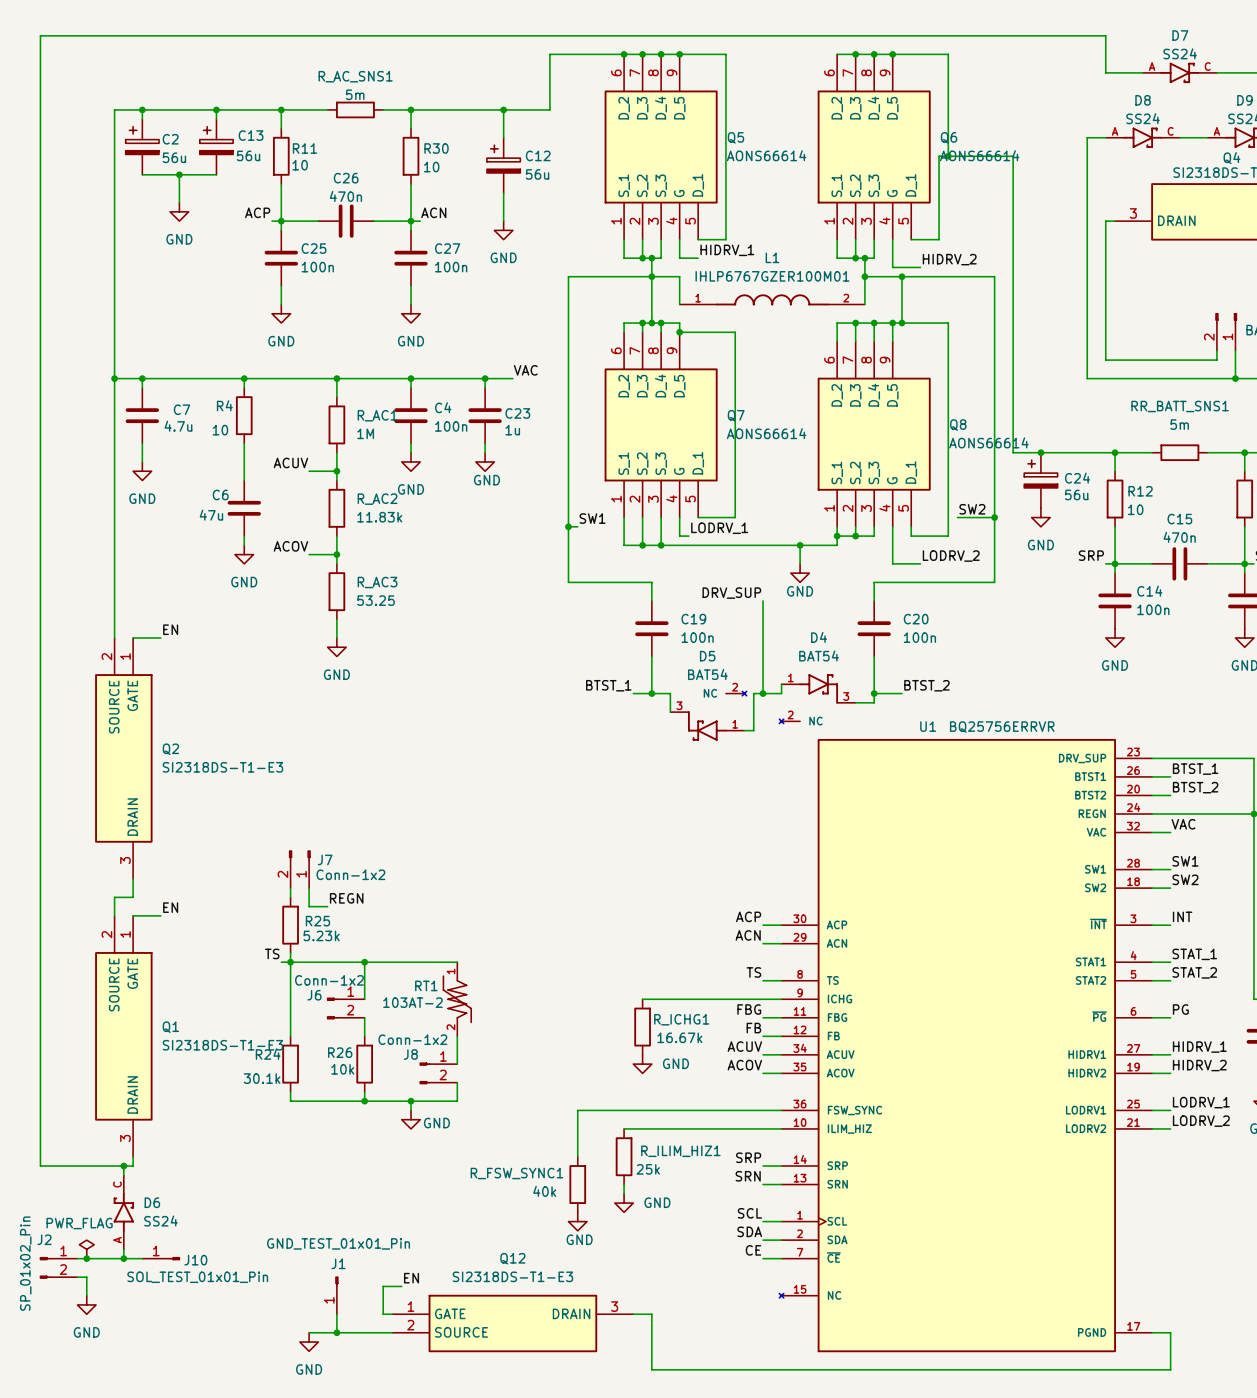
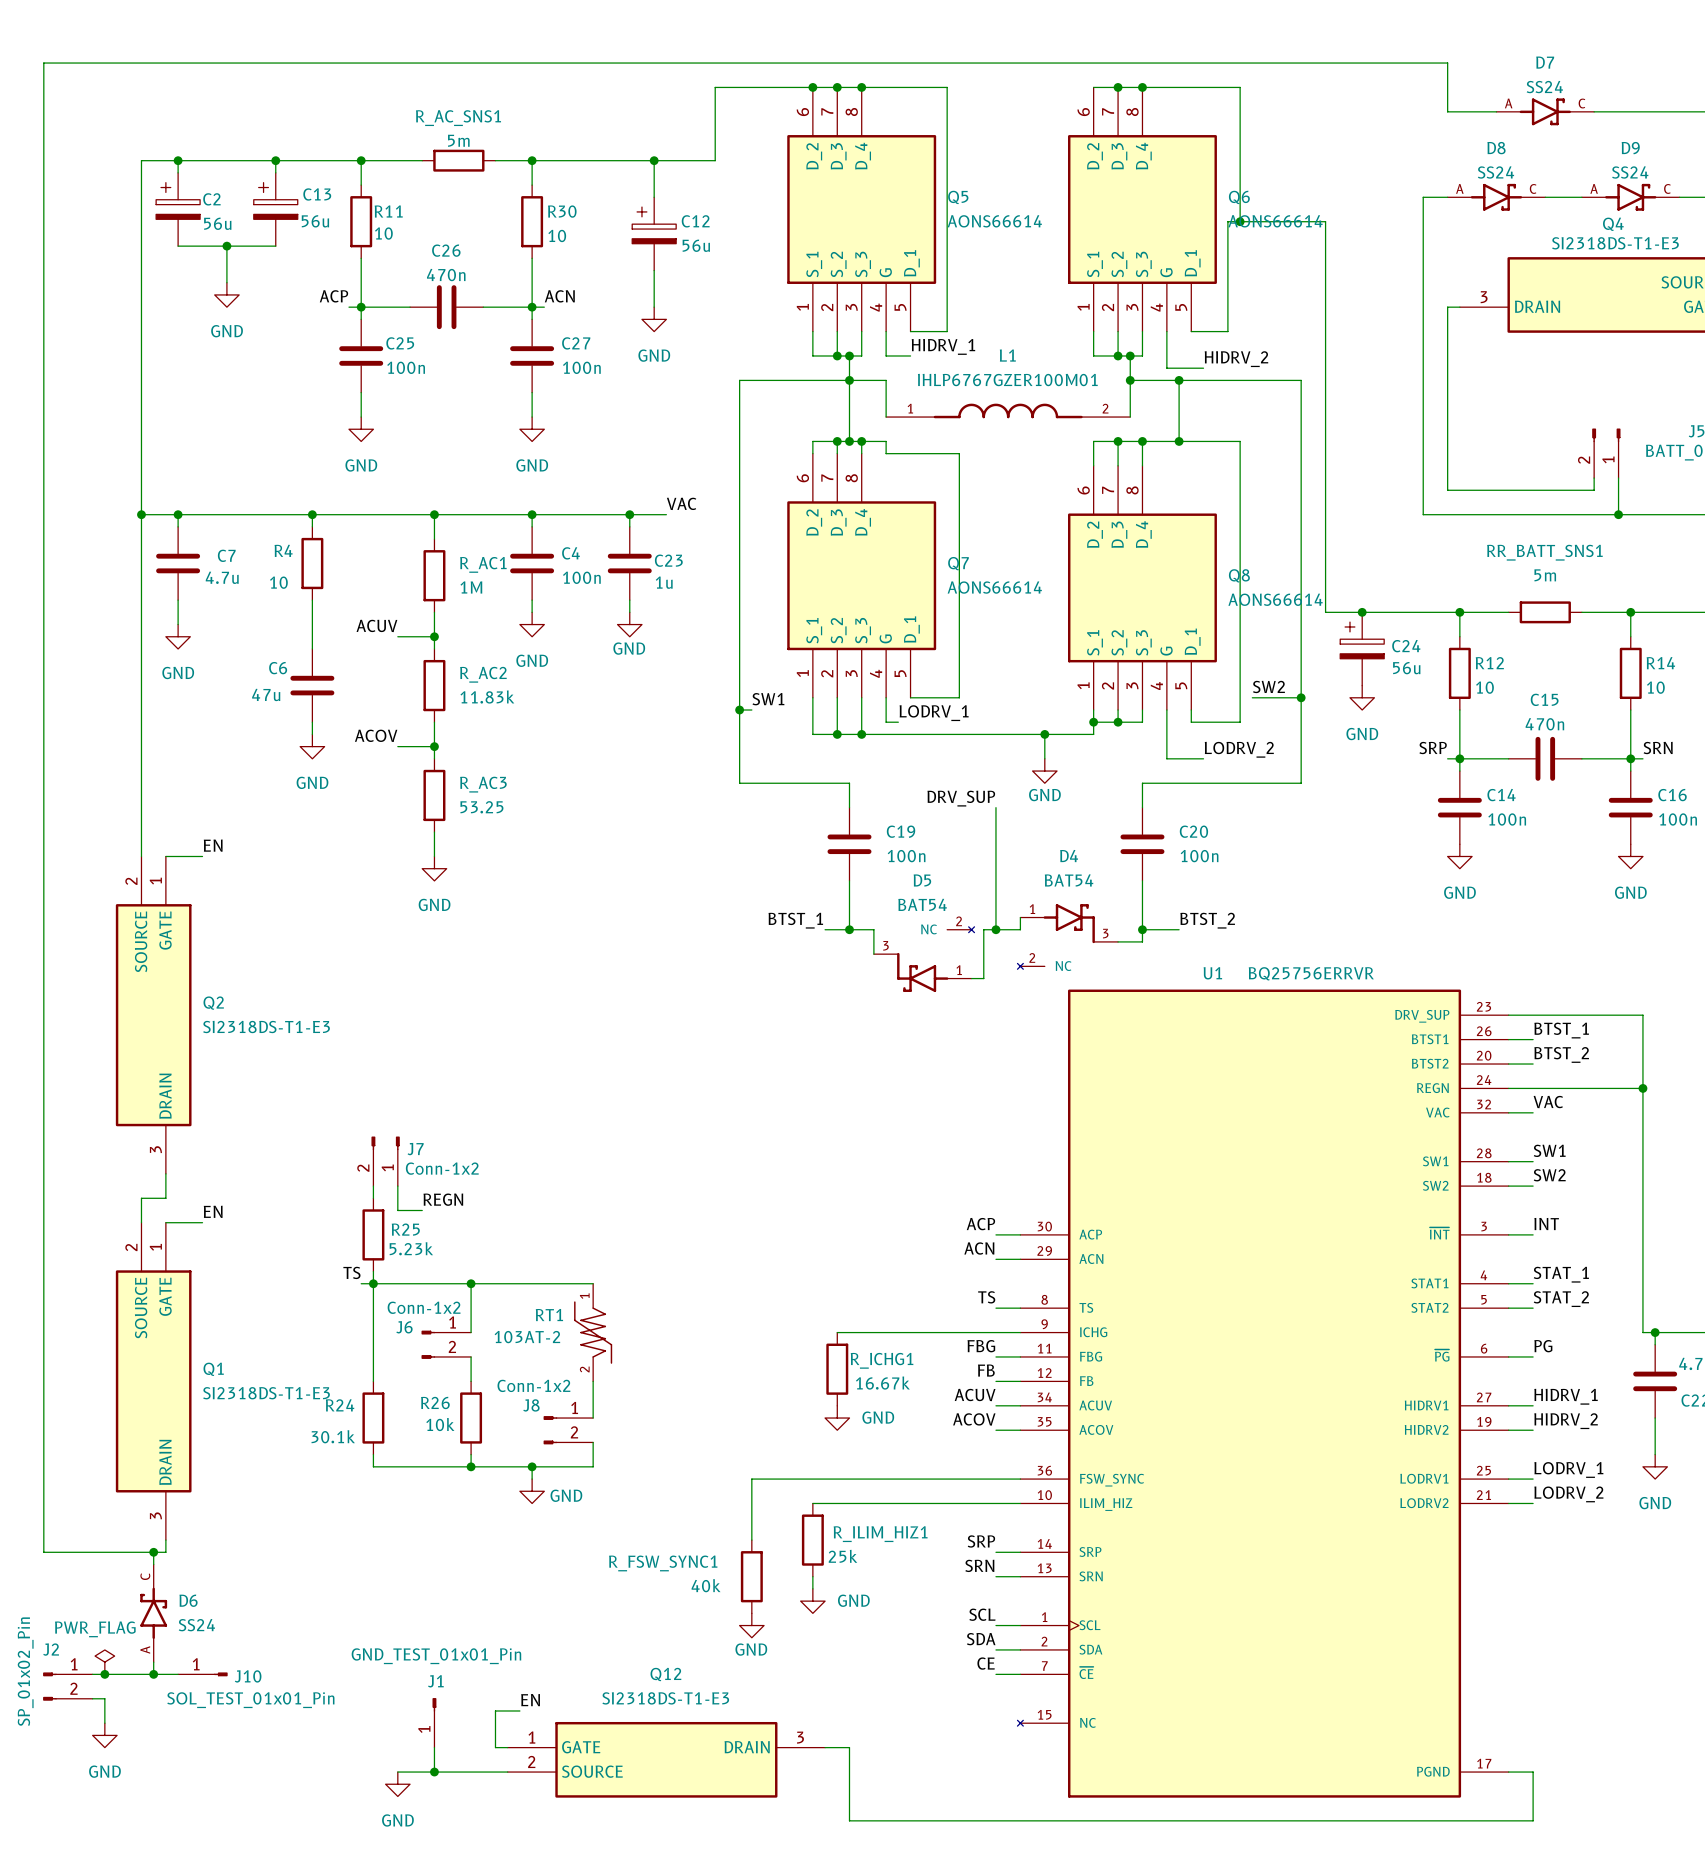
Q5 symbol: [604, 54, 718, 240] -> [787, 87, 937, 332]
junction: (679, 54) -> none
Q6 symbol: [817, 54, 931, 240] -> [1068, 87, 1217, 332]
junction: (892, 54) -> none
wire: (892, 323) (892, 341) -> none
junction: (892, 323) -> none
Q7 symbol: [604, 332, 718, 518] -> [787, 453, 937, 698]
junction: (679, 332) -> none
Q8 symbol: [817, 341, 931, 527] -> [1068, 465, 1217, 711]

